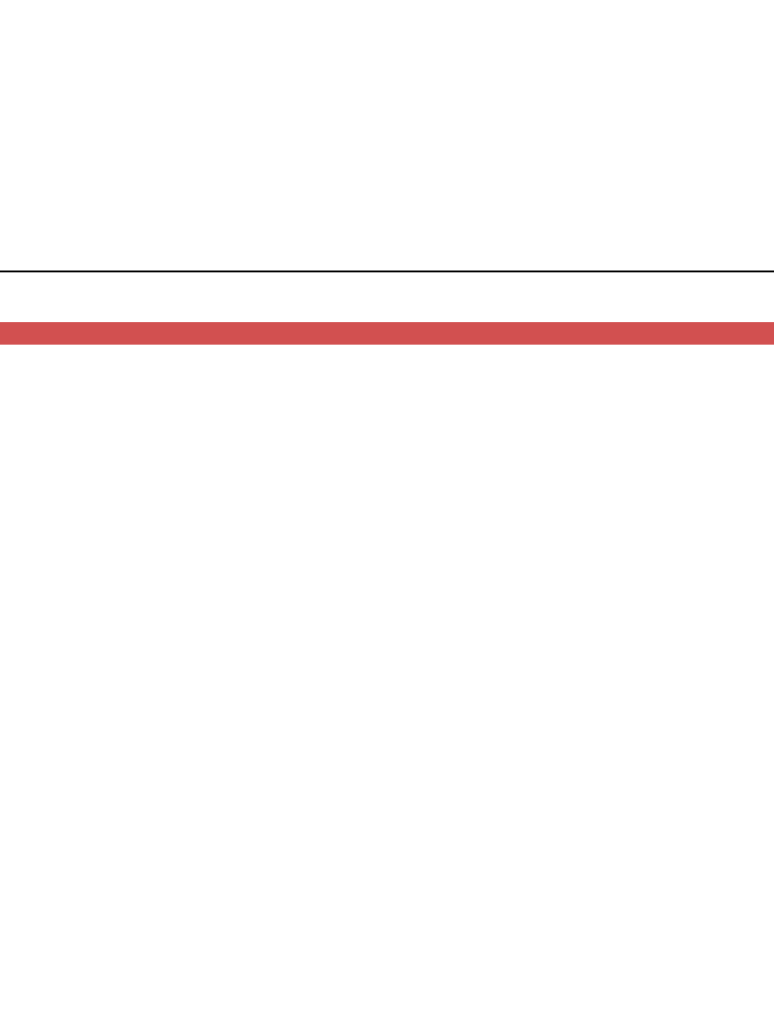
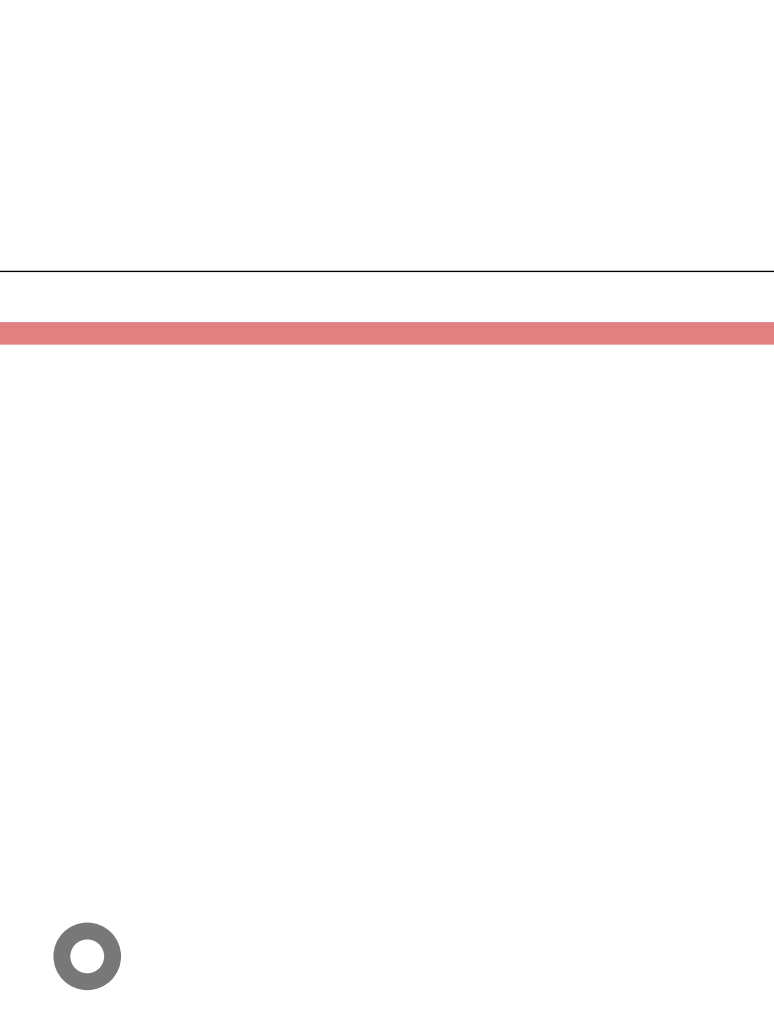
via: none -> (87, 956)

